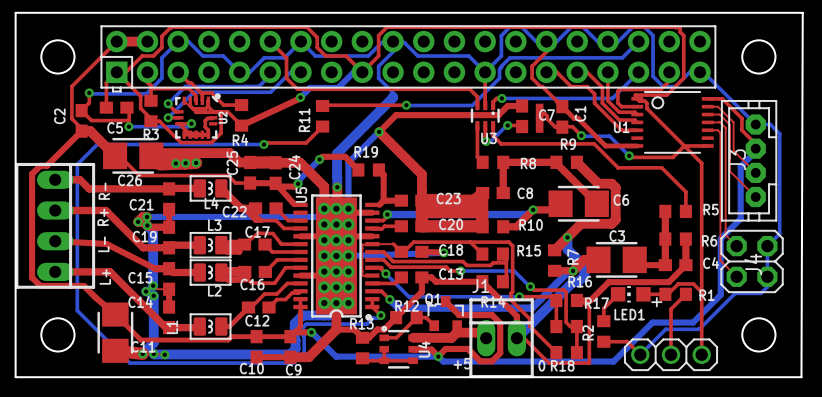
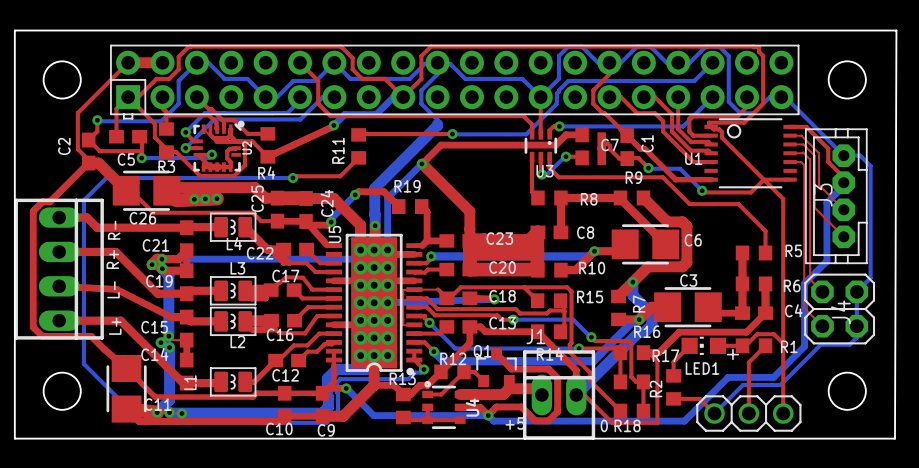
top track: none -> (186, 250) (178, 259) (161, 259)
top track: none -> (126, 409) (138, 421) (283, 421) (284, 416)

